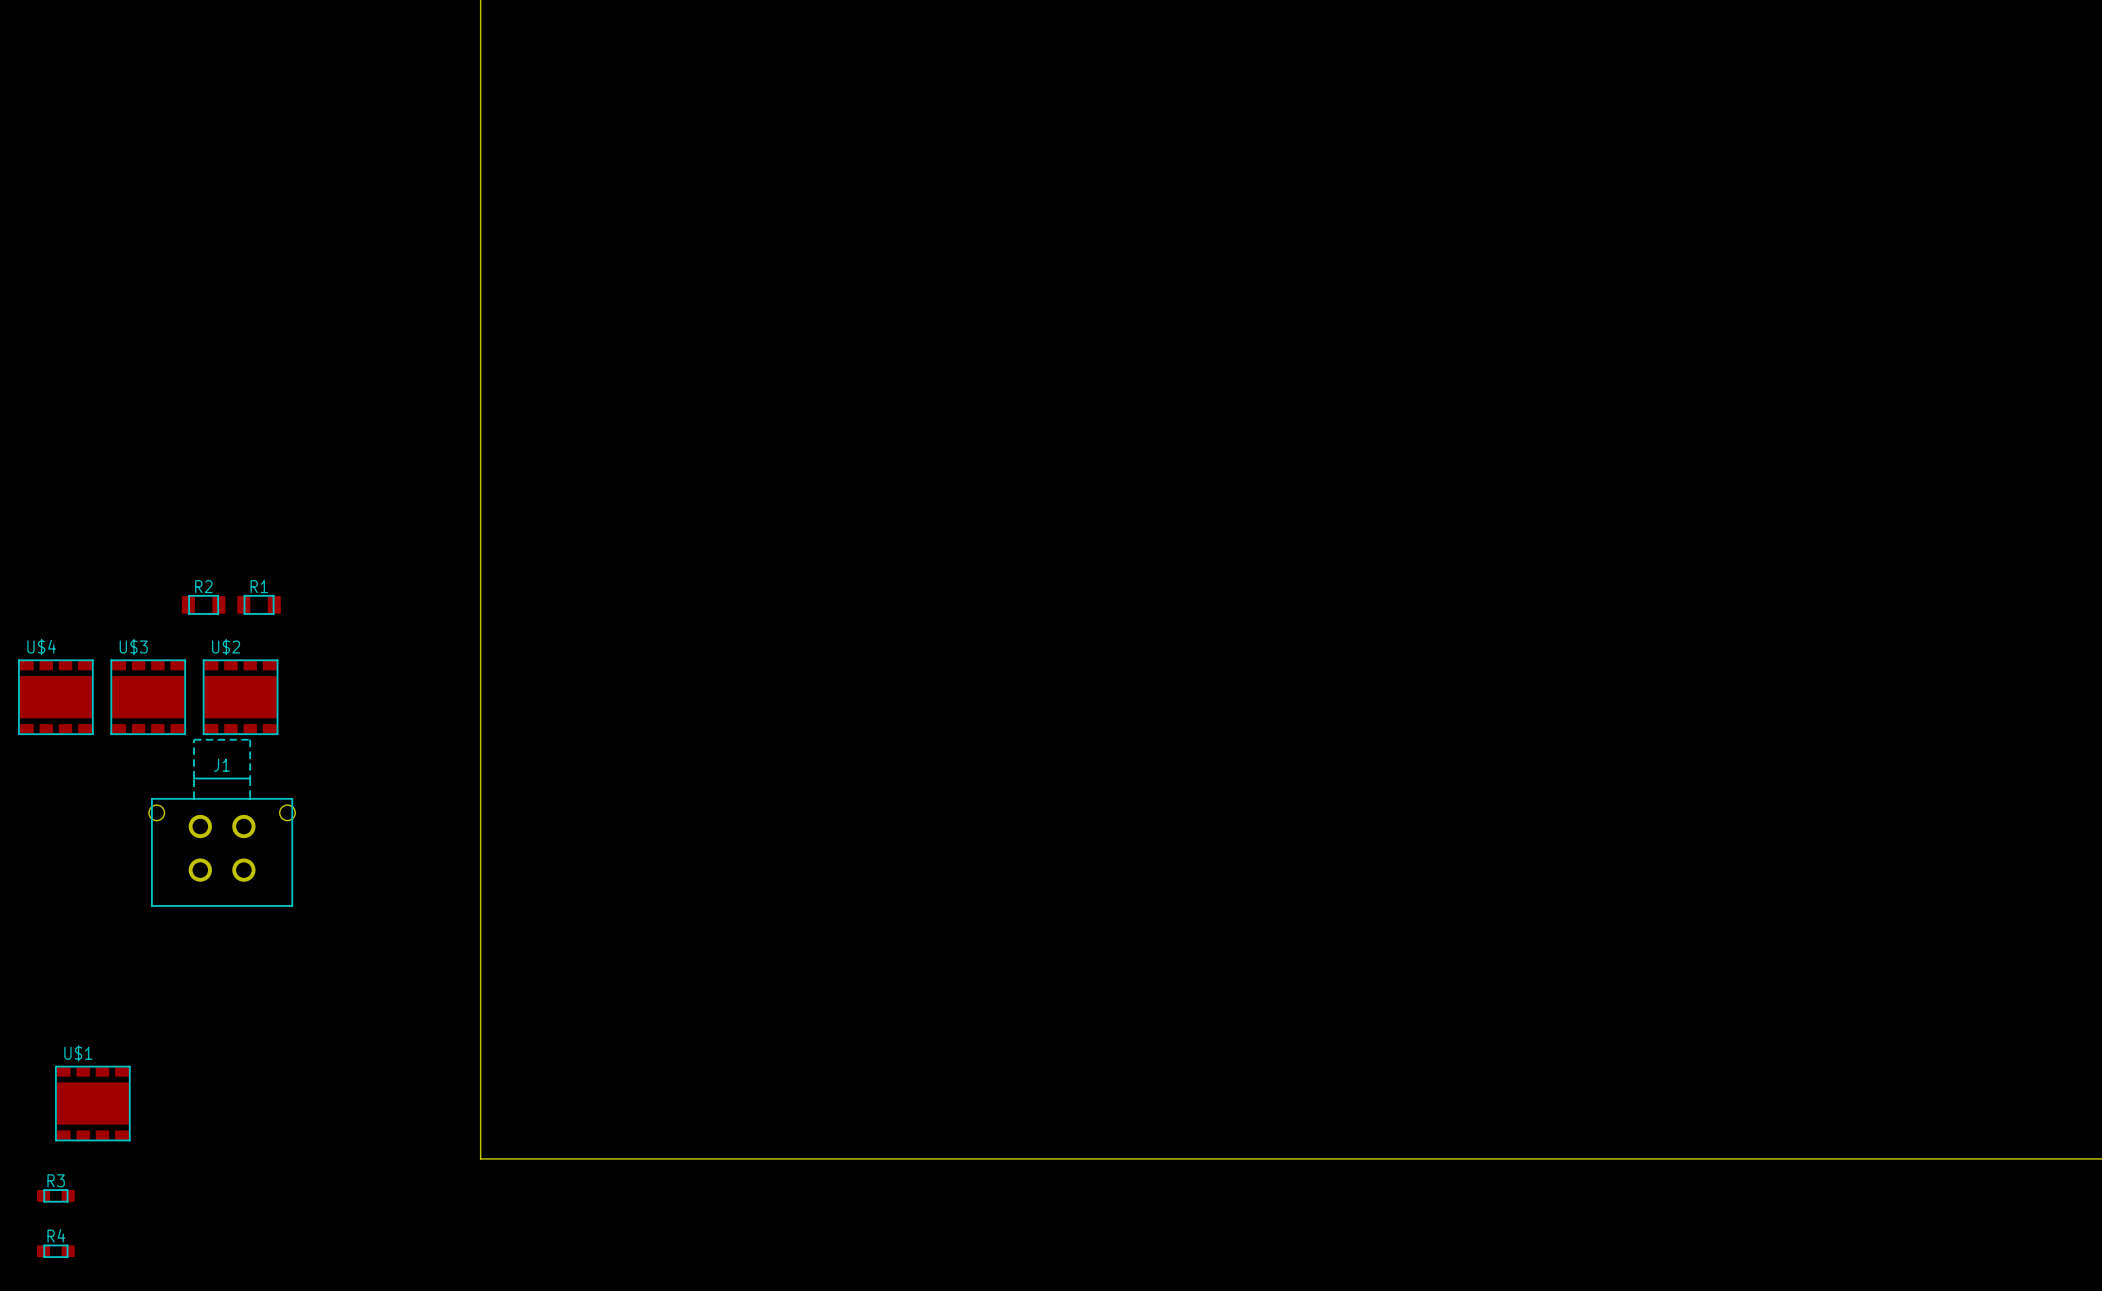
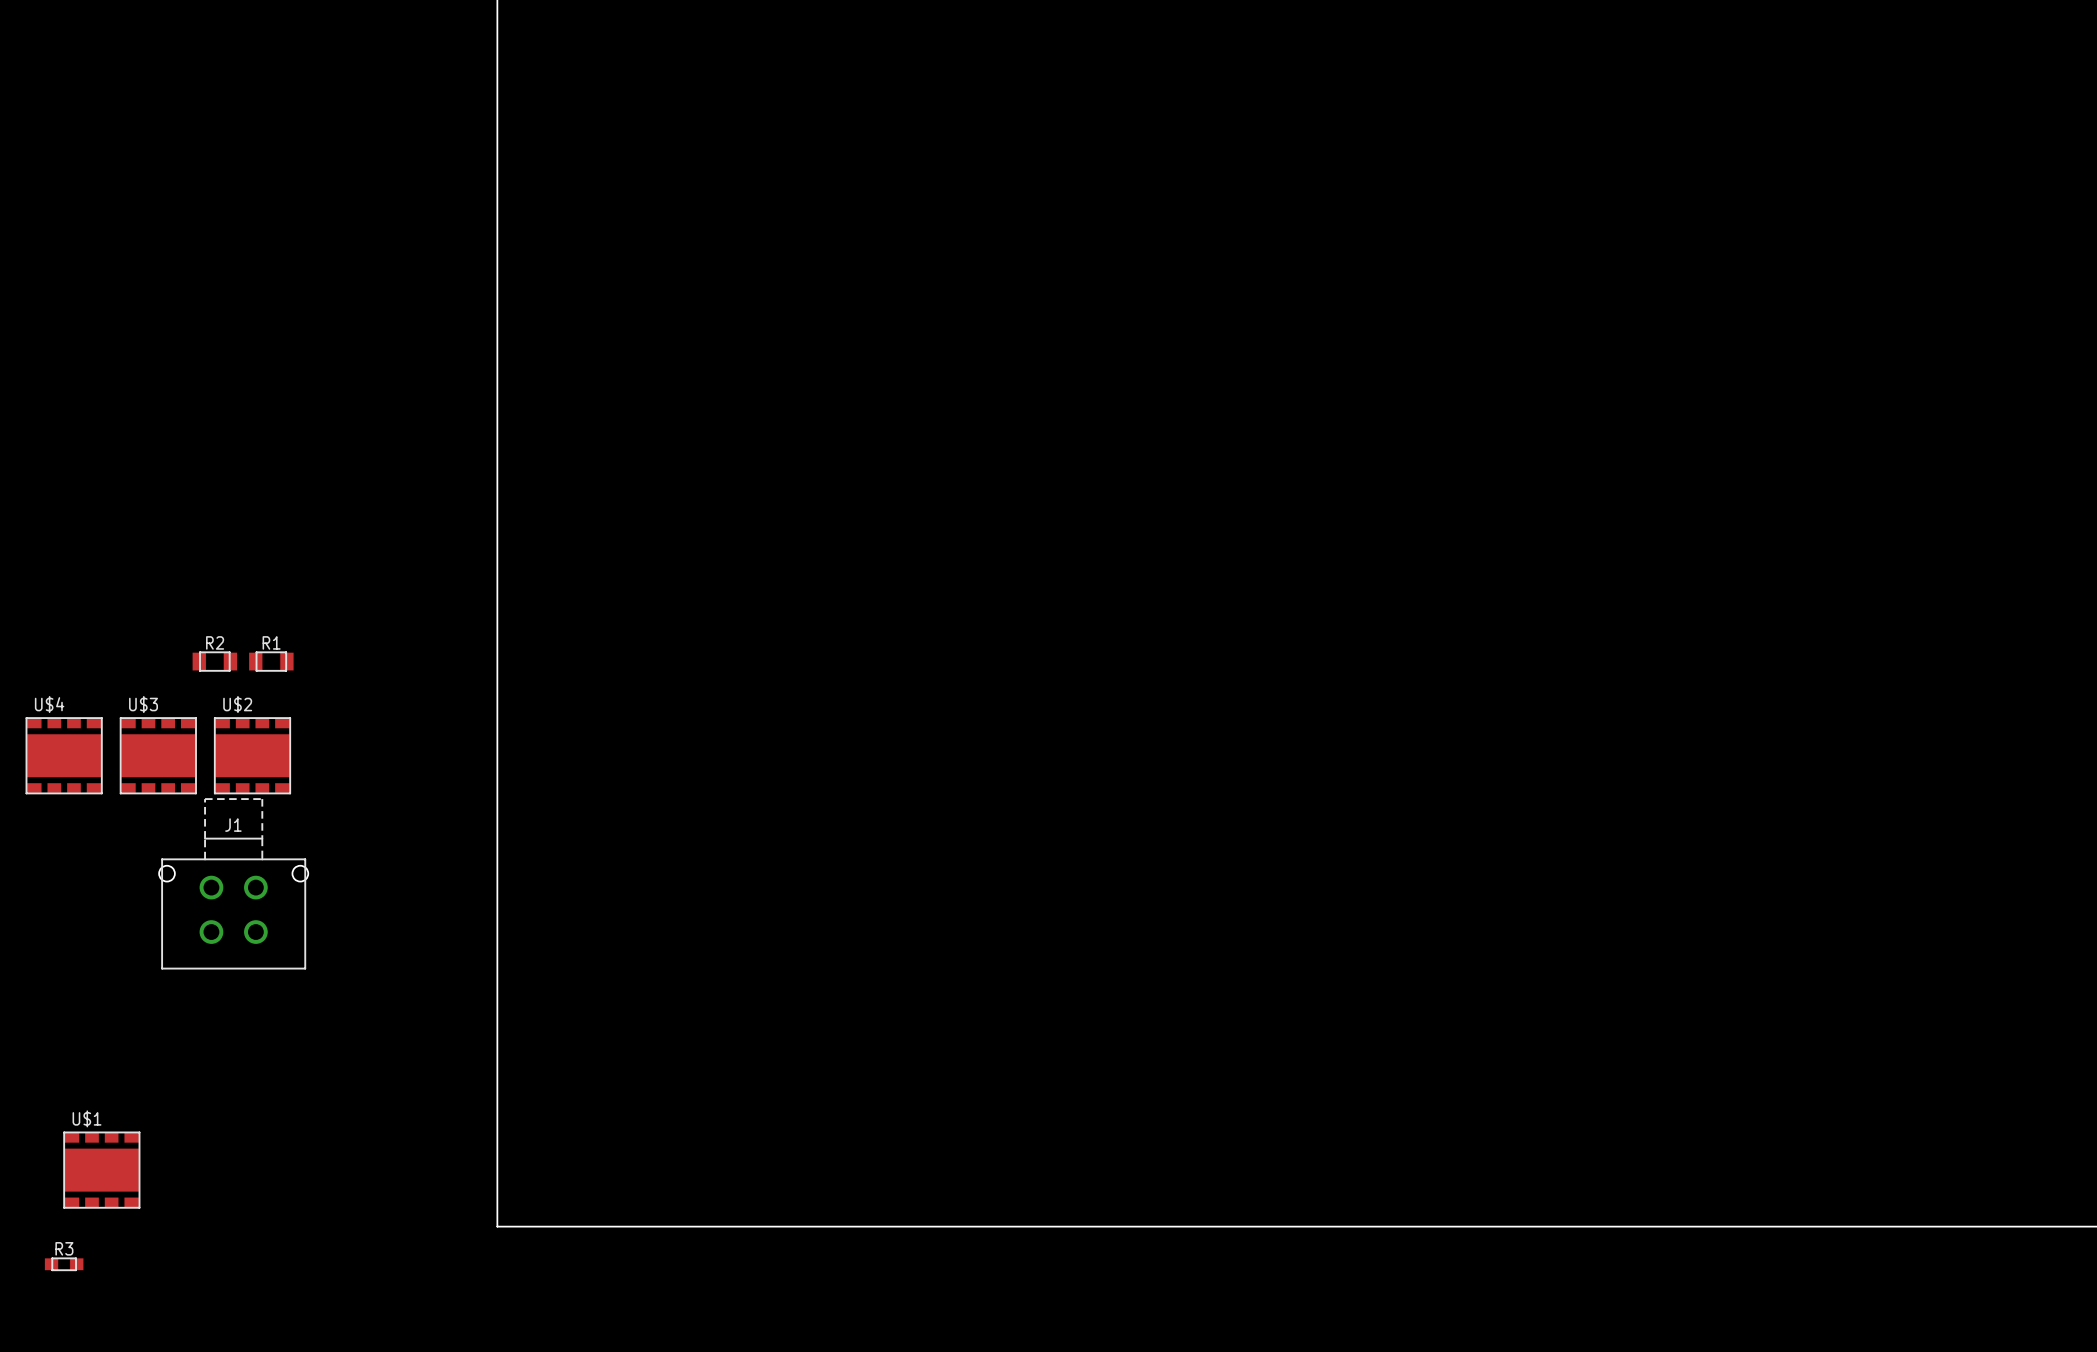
R4: (55, 1251) -> none

